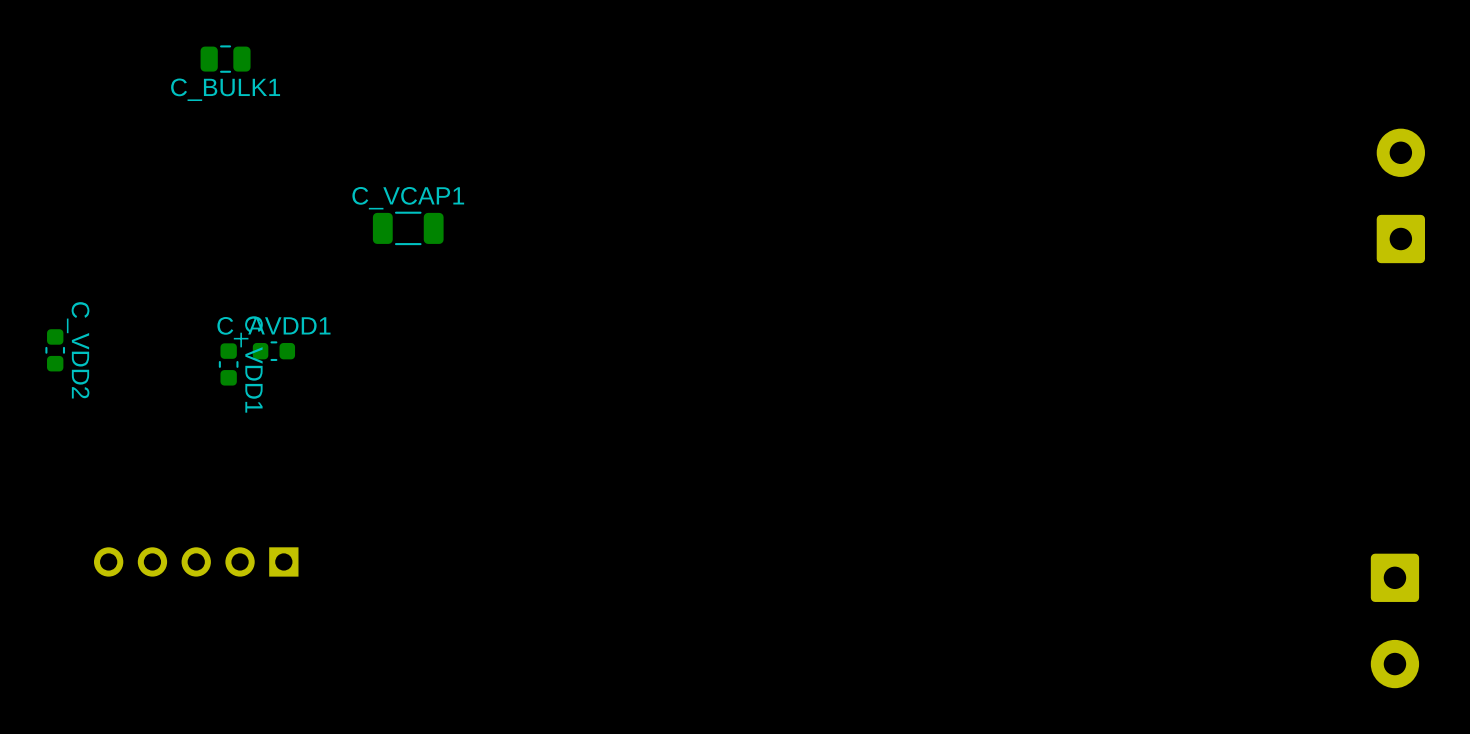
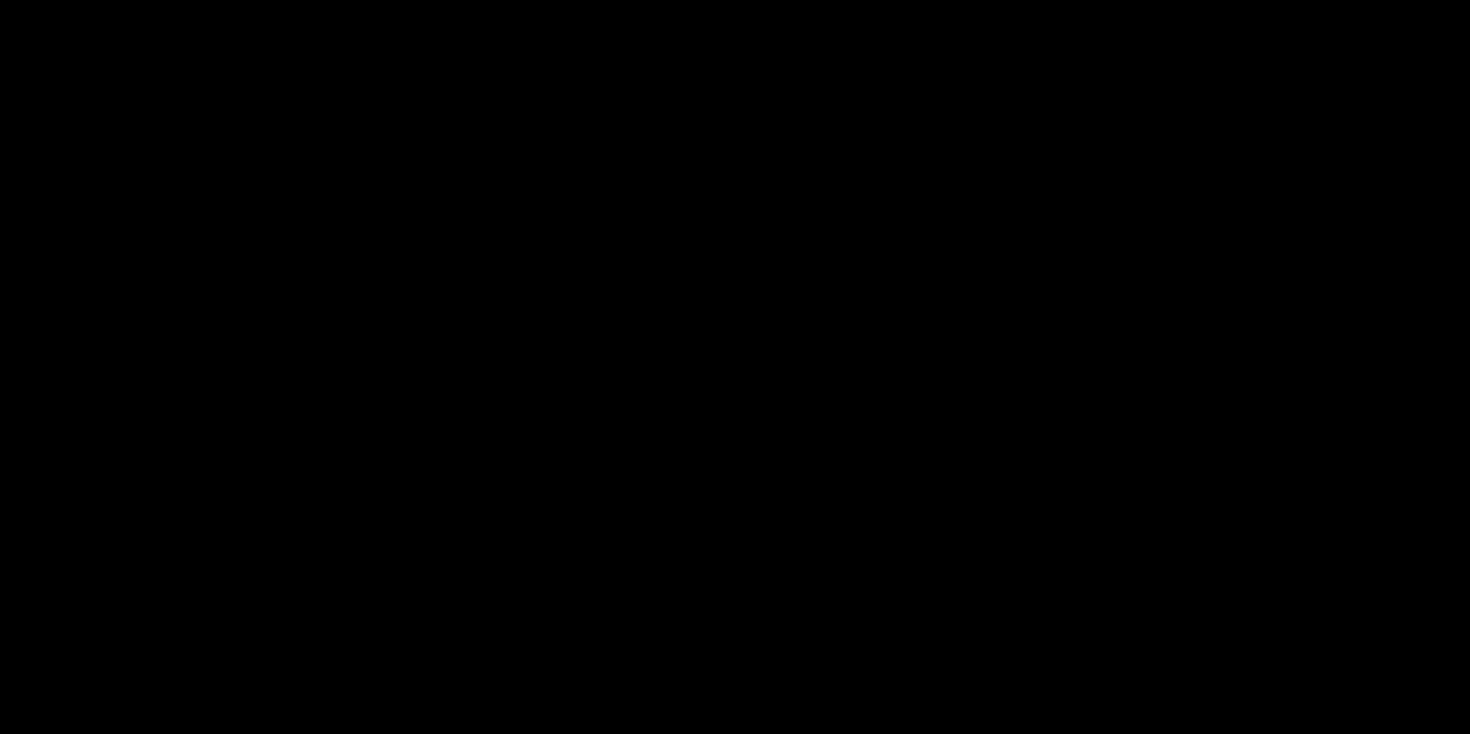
C_BULK1: (225, 59) -> none
part: (1400, 195) -> none
C_VCAP1: (408, 228) -> none
C_VDD2: (55, 350) -> none
C_AVDD1: (273, 351) -> none
C_VDD1: (228, 364) -> none
part: (196, 561) -> none
part: (1394, 620) -> none

